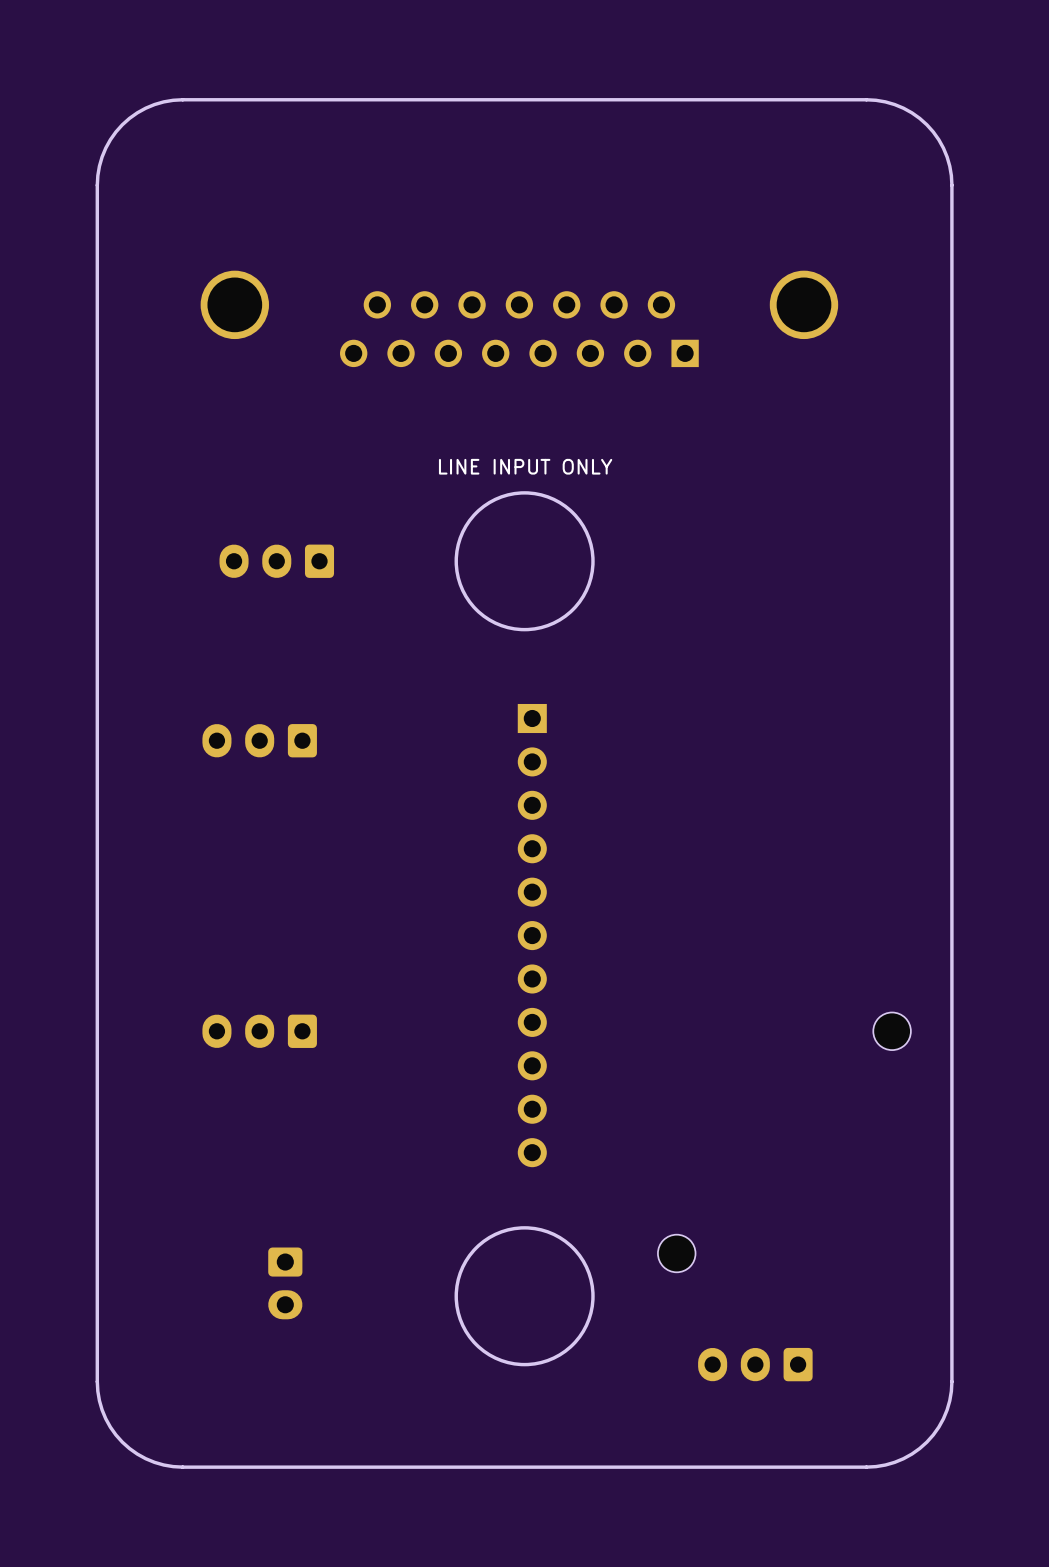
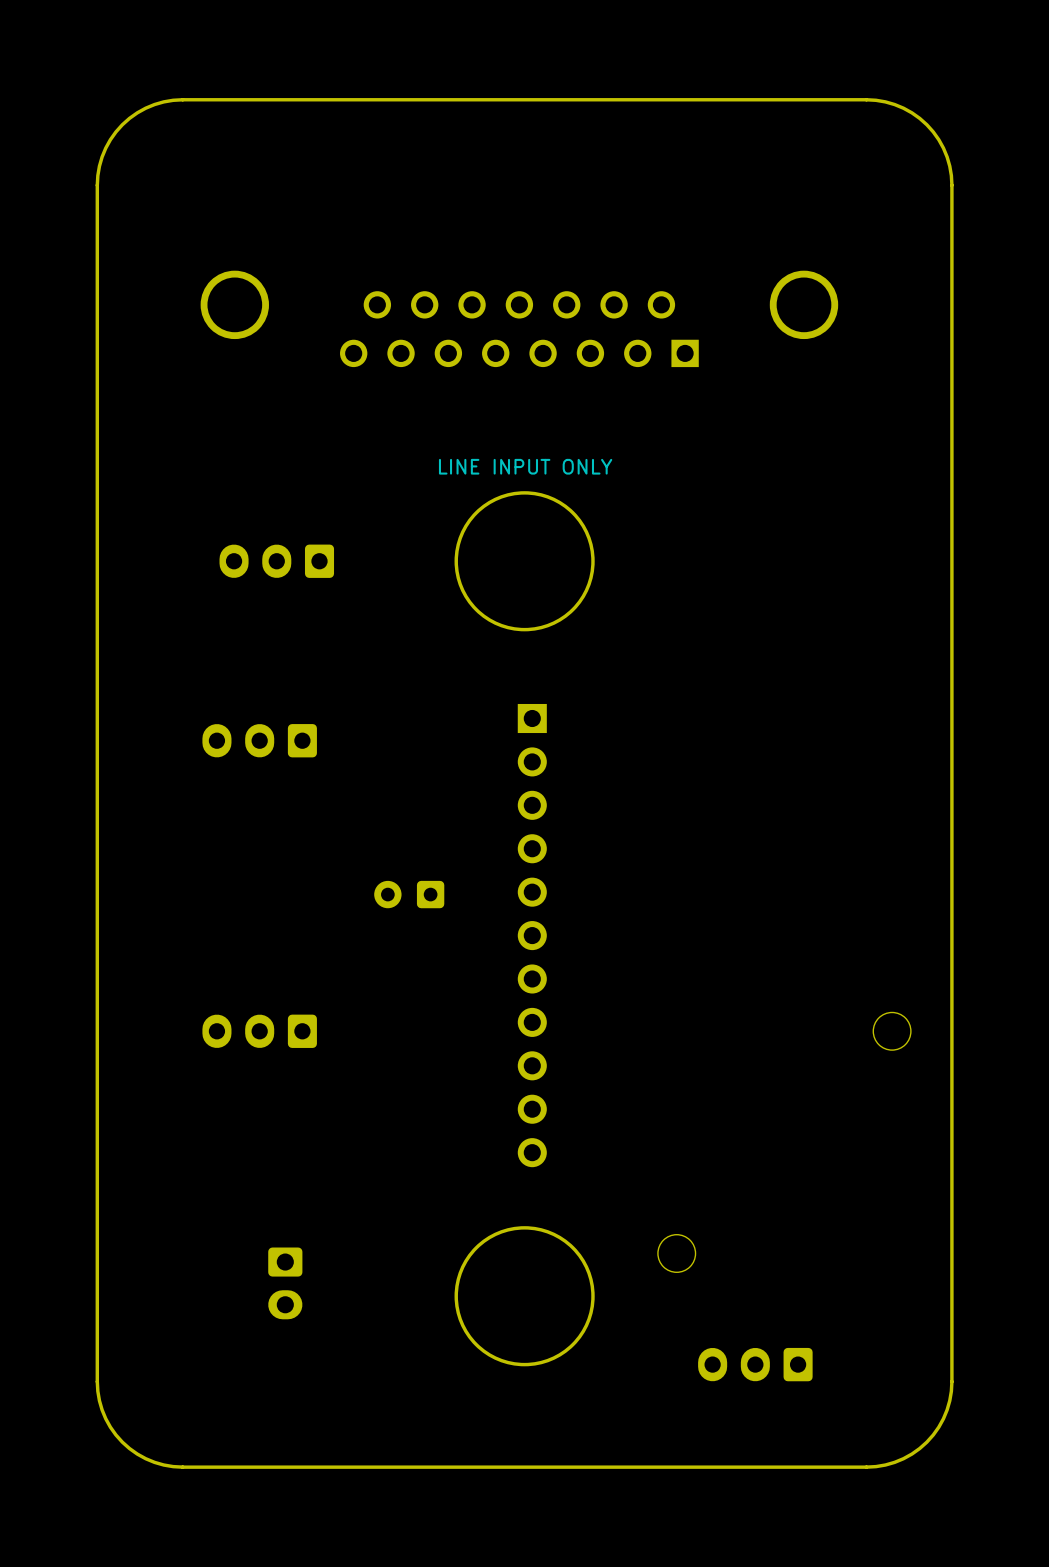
part: none -> (409, 894)

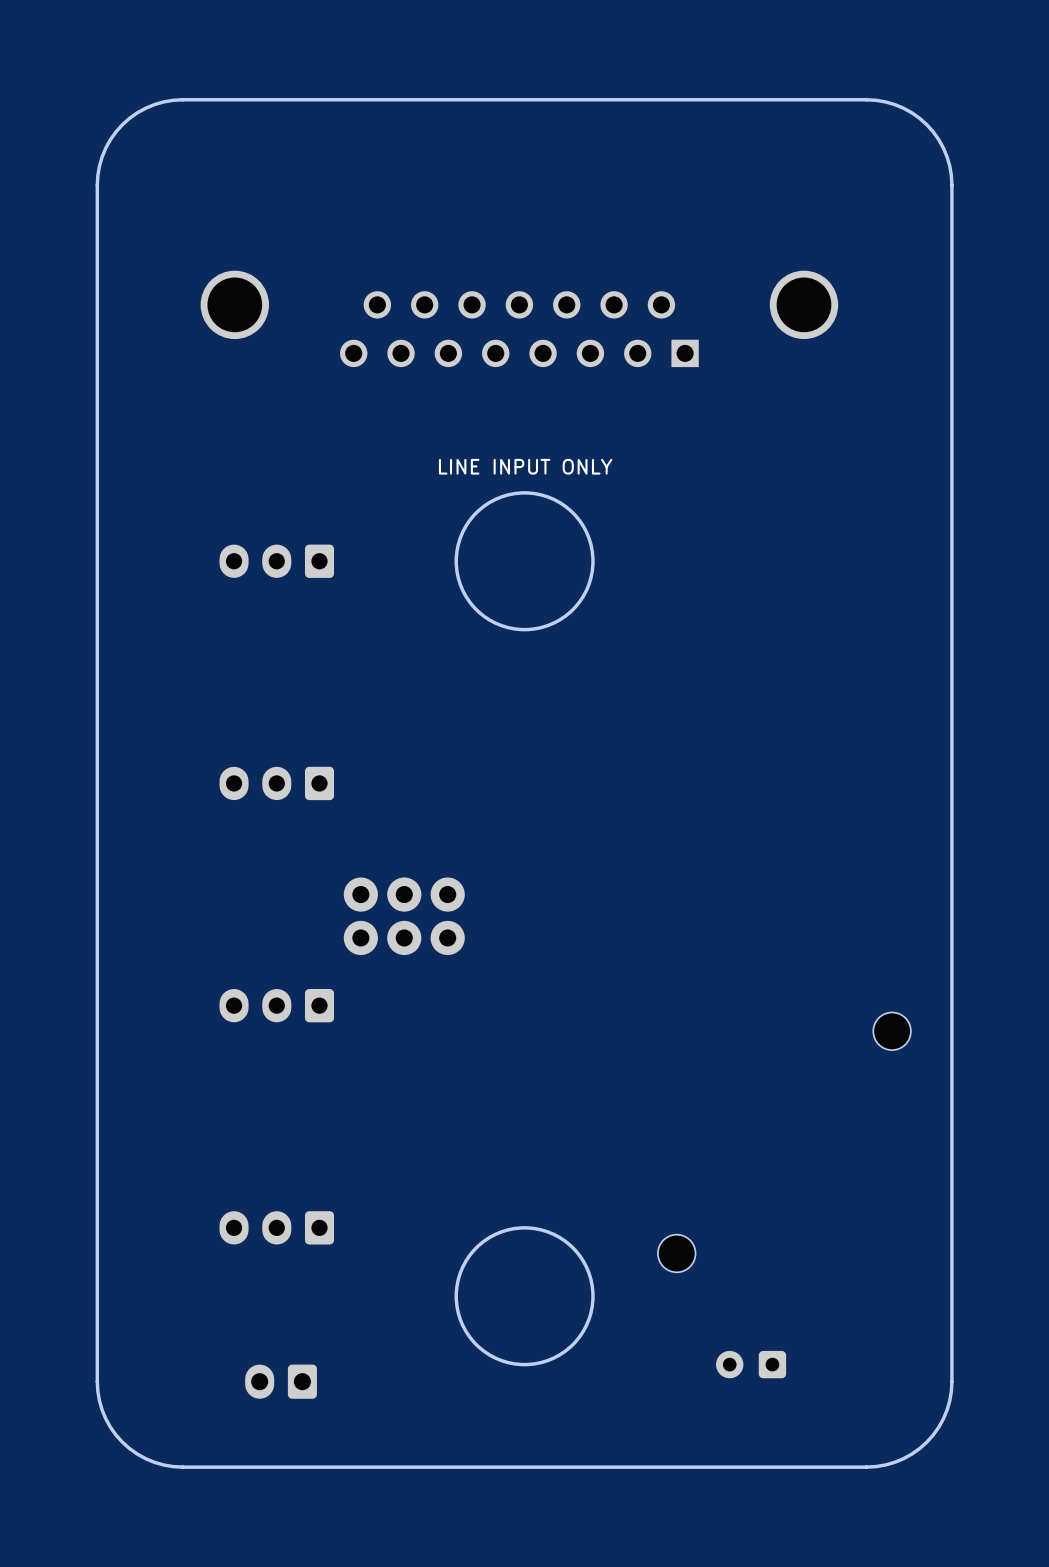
part position: (259, 740) -> (276, 783)
part: (409, 894) -> none
part: none -> (404, 916)
part: (532, 935) -> none
part position: (259, 1031) -> (276, 1005)
part: none -> (276, 1227)
part rotation: 0° (285, 1283) -> 90° clockwise (281, 1381)
part position: (285, 1283) -> (281, 1381)
part footprint: [698, 1347, 813, 1382] -> [716, 1350, 787, 1379]

